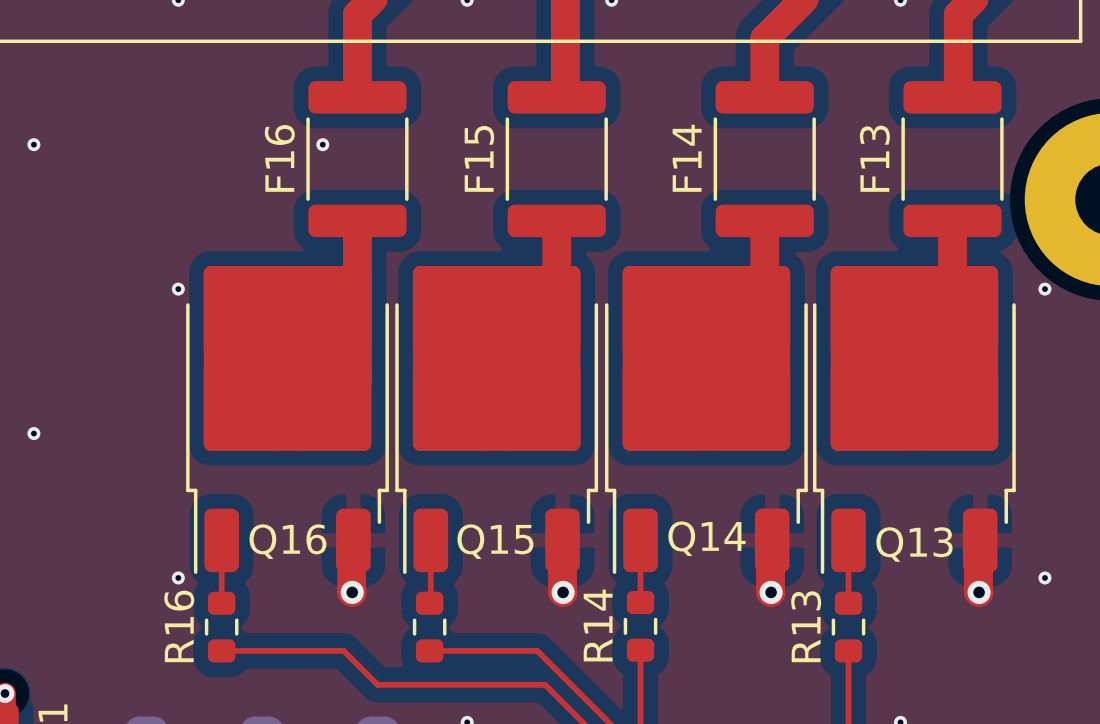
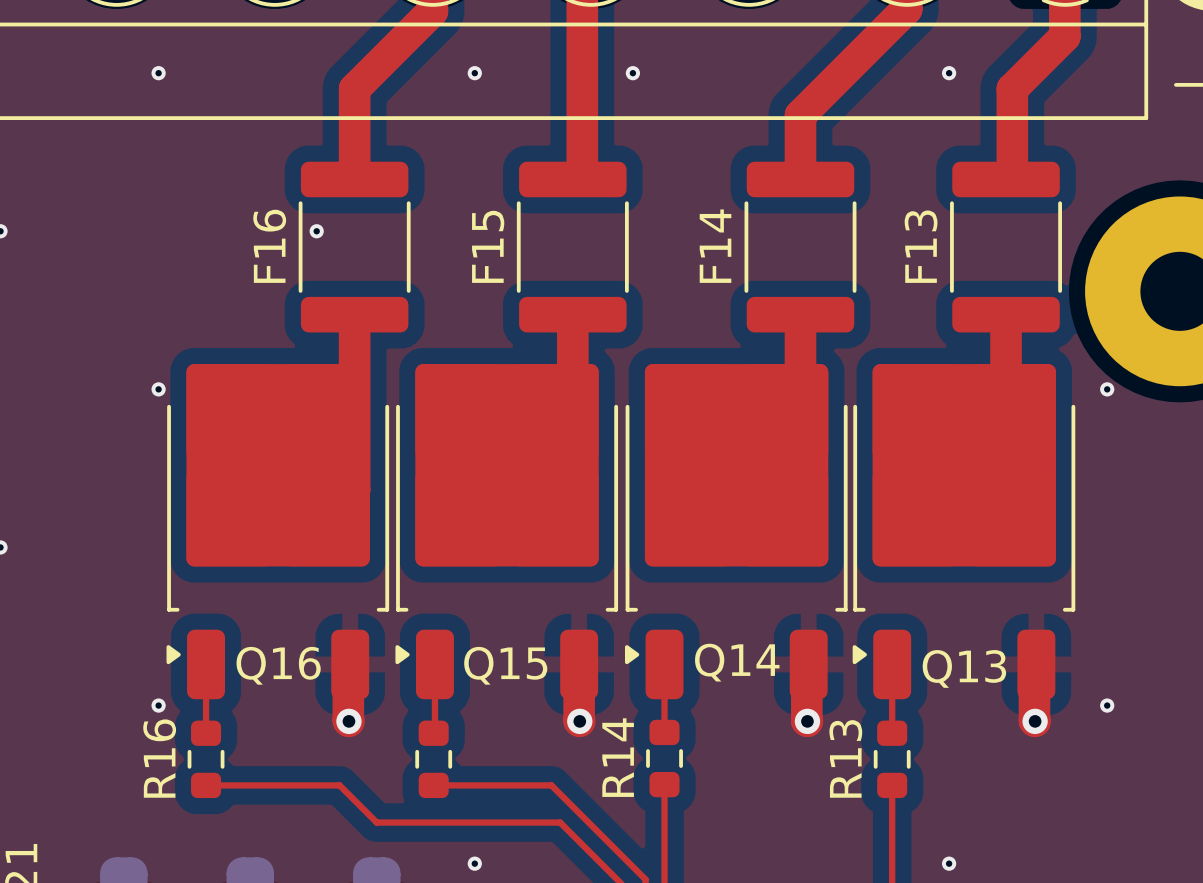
Q16 footprint: [186, 265, 389, 574] -> [166, 364, 390, 700]
Q15 footprint: [395, 265, 599, 574] -> [395, 364, 619, 700]
Q14 footprint: [605, 265, 808, 574] -> [625, 364, 848, 700]
Q13 footprint: [812, 265, 1016, 574] -> [852, 364, 1076, 700]

